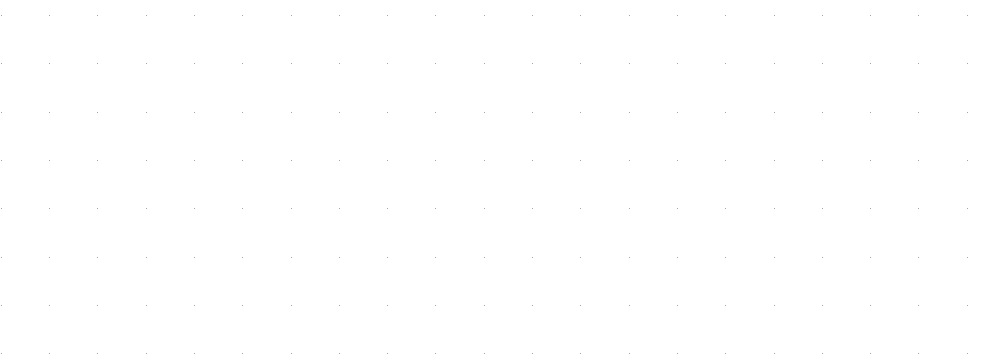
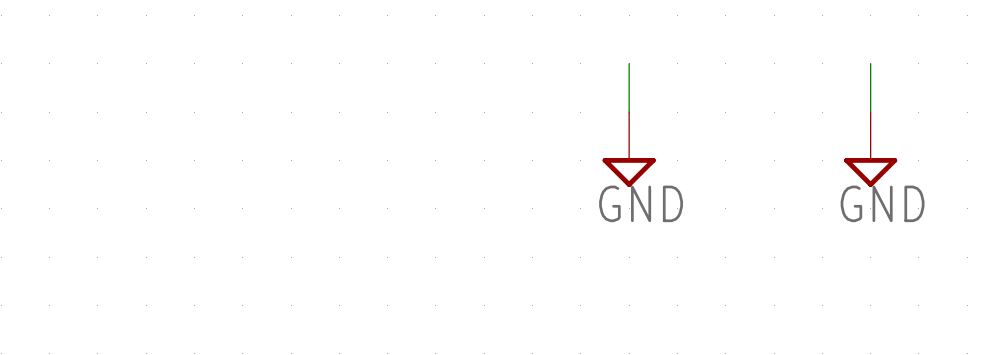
wire: none -> (629, 63) (629, 112)
wire: none -> (870, 63) (870, 112)
power symbol: none -> GND (629, 149)
power symbol: none -> GND (870, 149)

